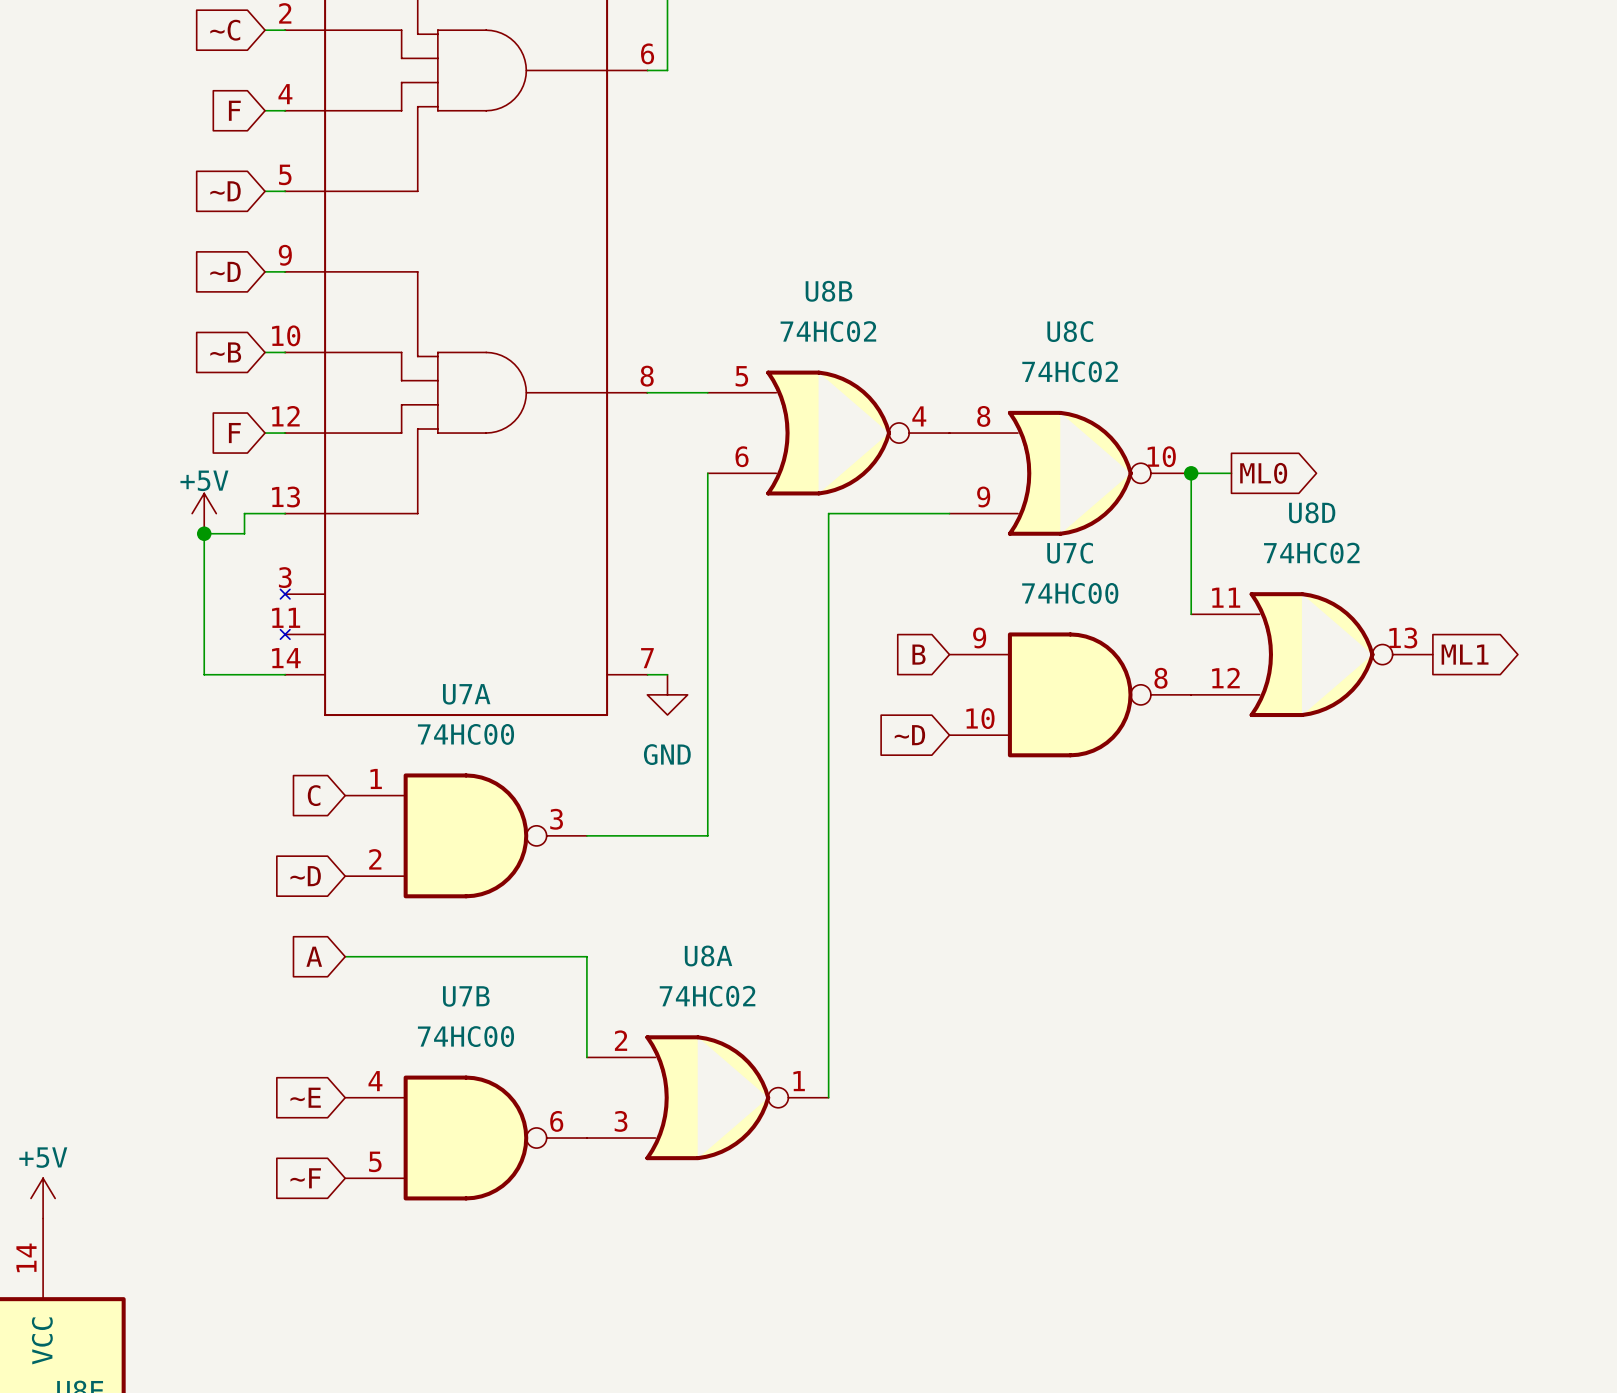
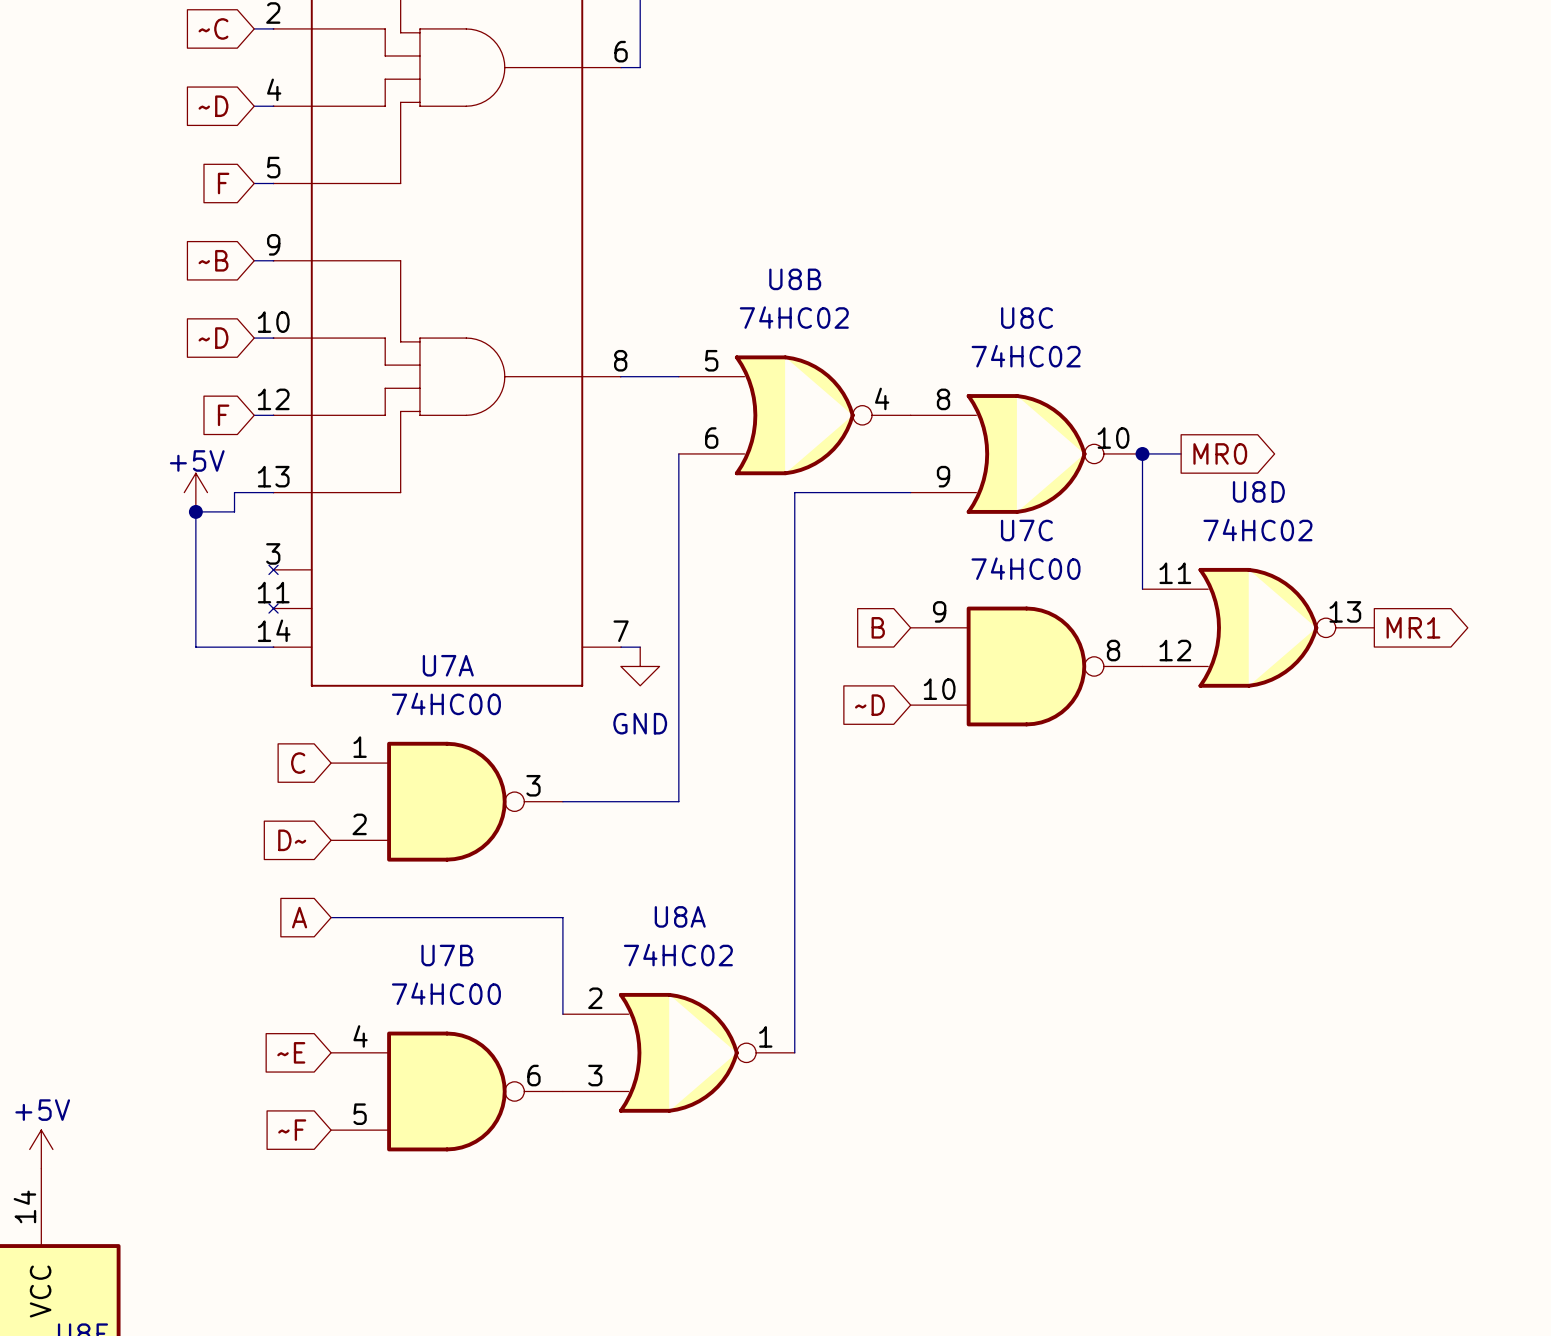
global label: F (234, 110) -> ~D (213, 106)
global label: ~D (225, 191) -> F (223, 183)
global label: ~D (225, 271) -> ~B (213, 260)
global label: ~B (225, 352) -> ~D (213, 338)
global label: ML0 (1263, 473) -> MR0 (1220, 453)
global label: ML1 (1465, 654) -> MR1 (1413, 627)
global label: ~D (305, 876) -> D~ (292, 840)

